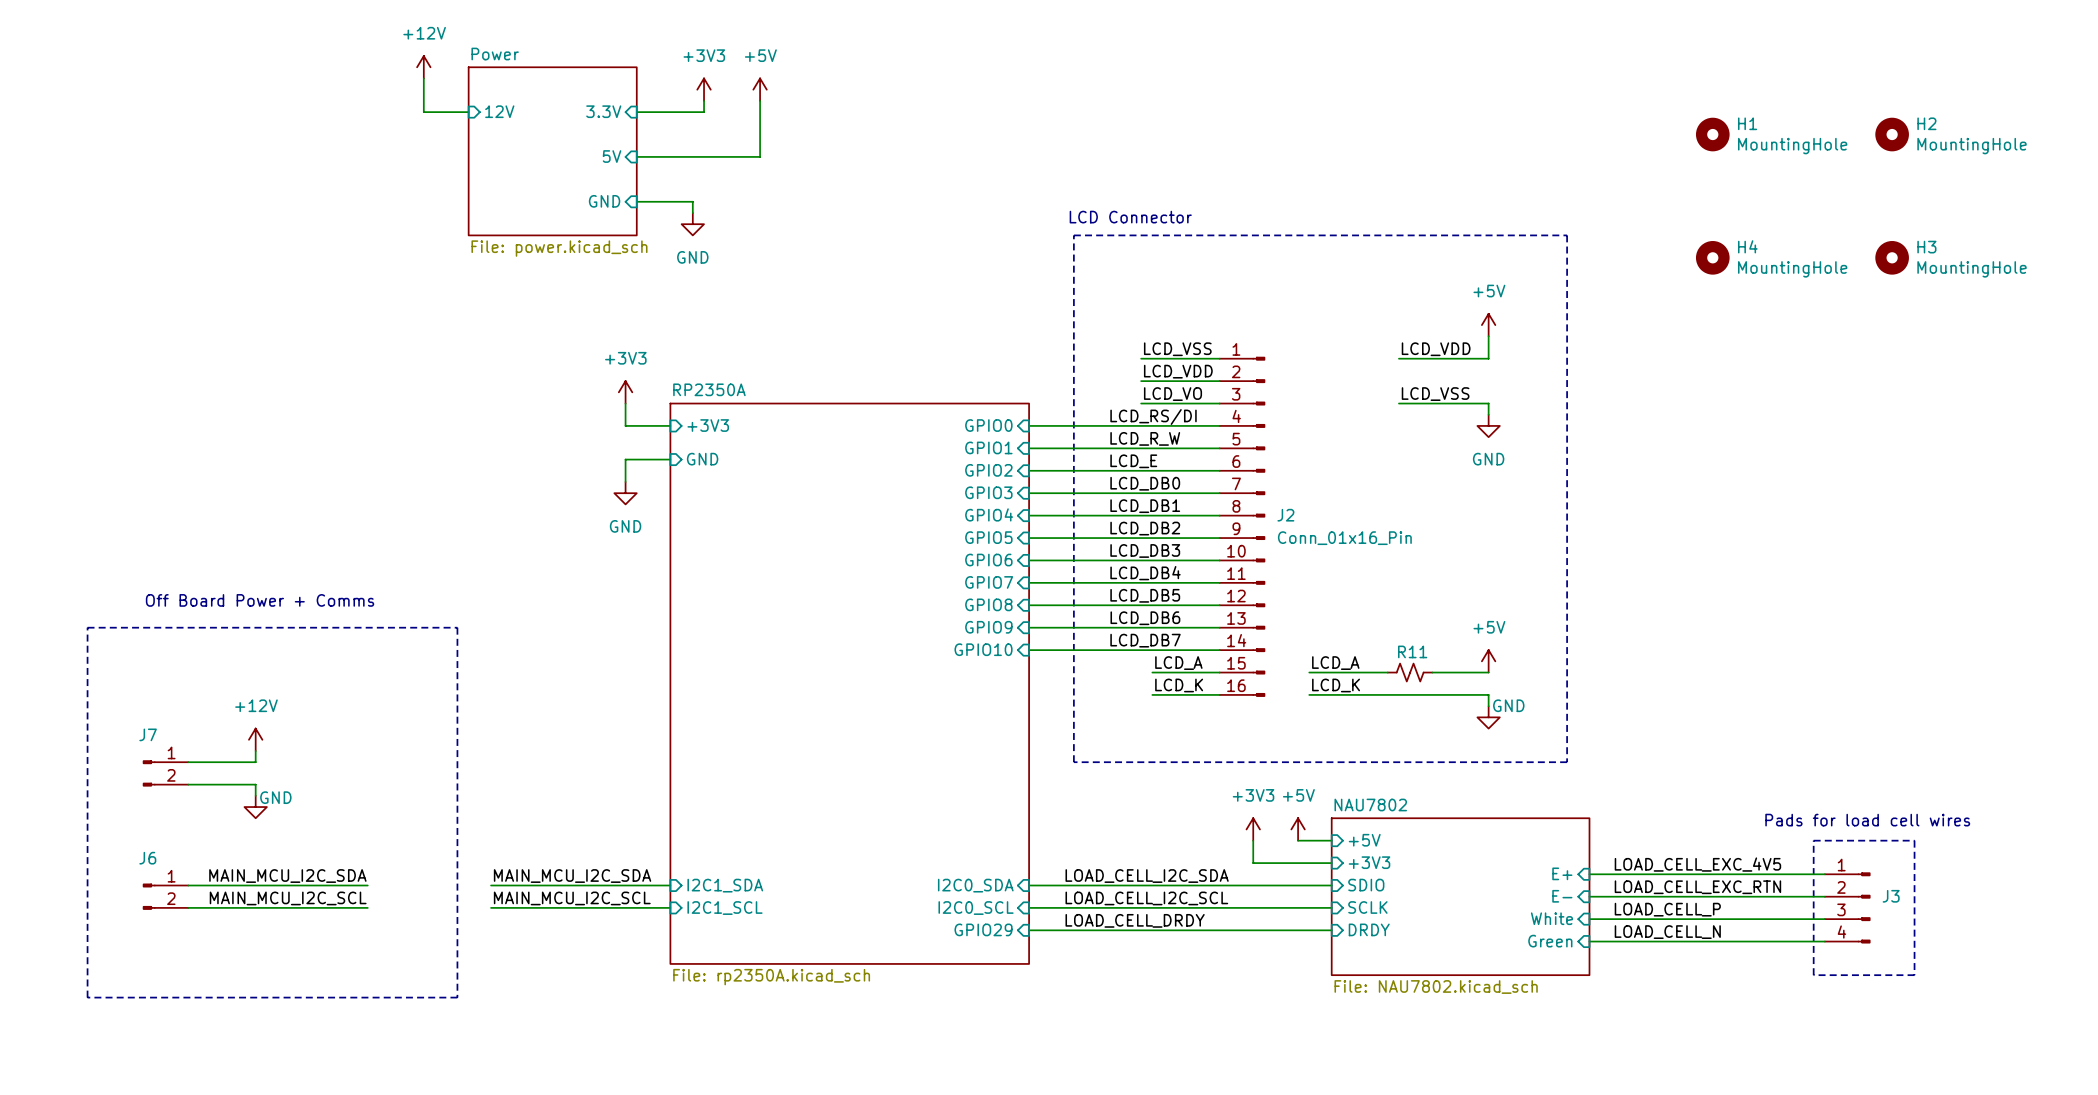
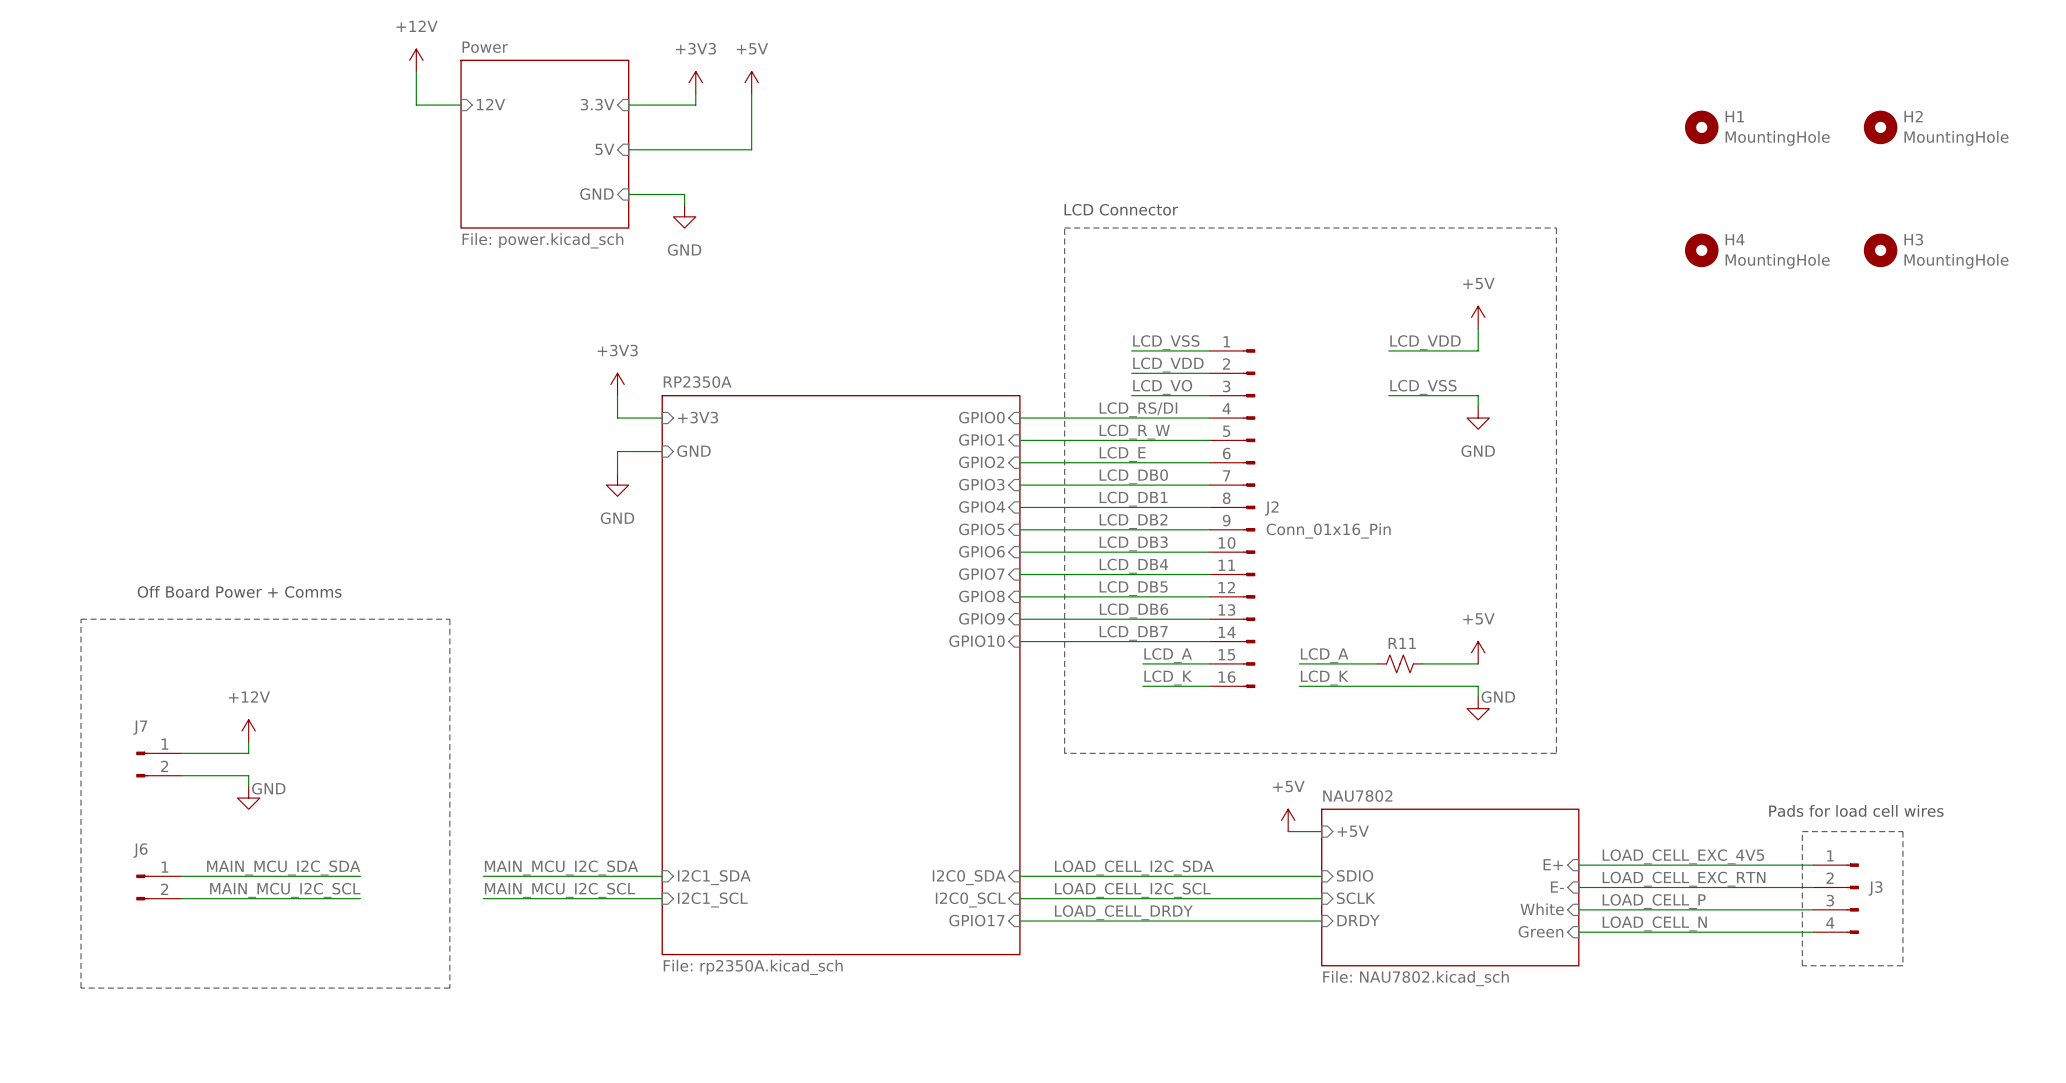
power symbol: +3V3 (1253, 829) -> none
wire: (1253, 840) (1253, 863) (1331, 863) -> none
sheet pin: +3V3 (1369, 862) -> none
sheet pin: GPIO29 (983, 929) -> GPIO17 (976, 920)

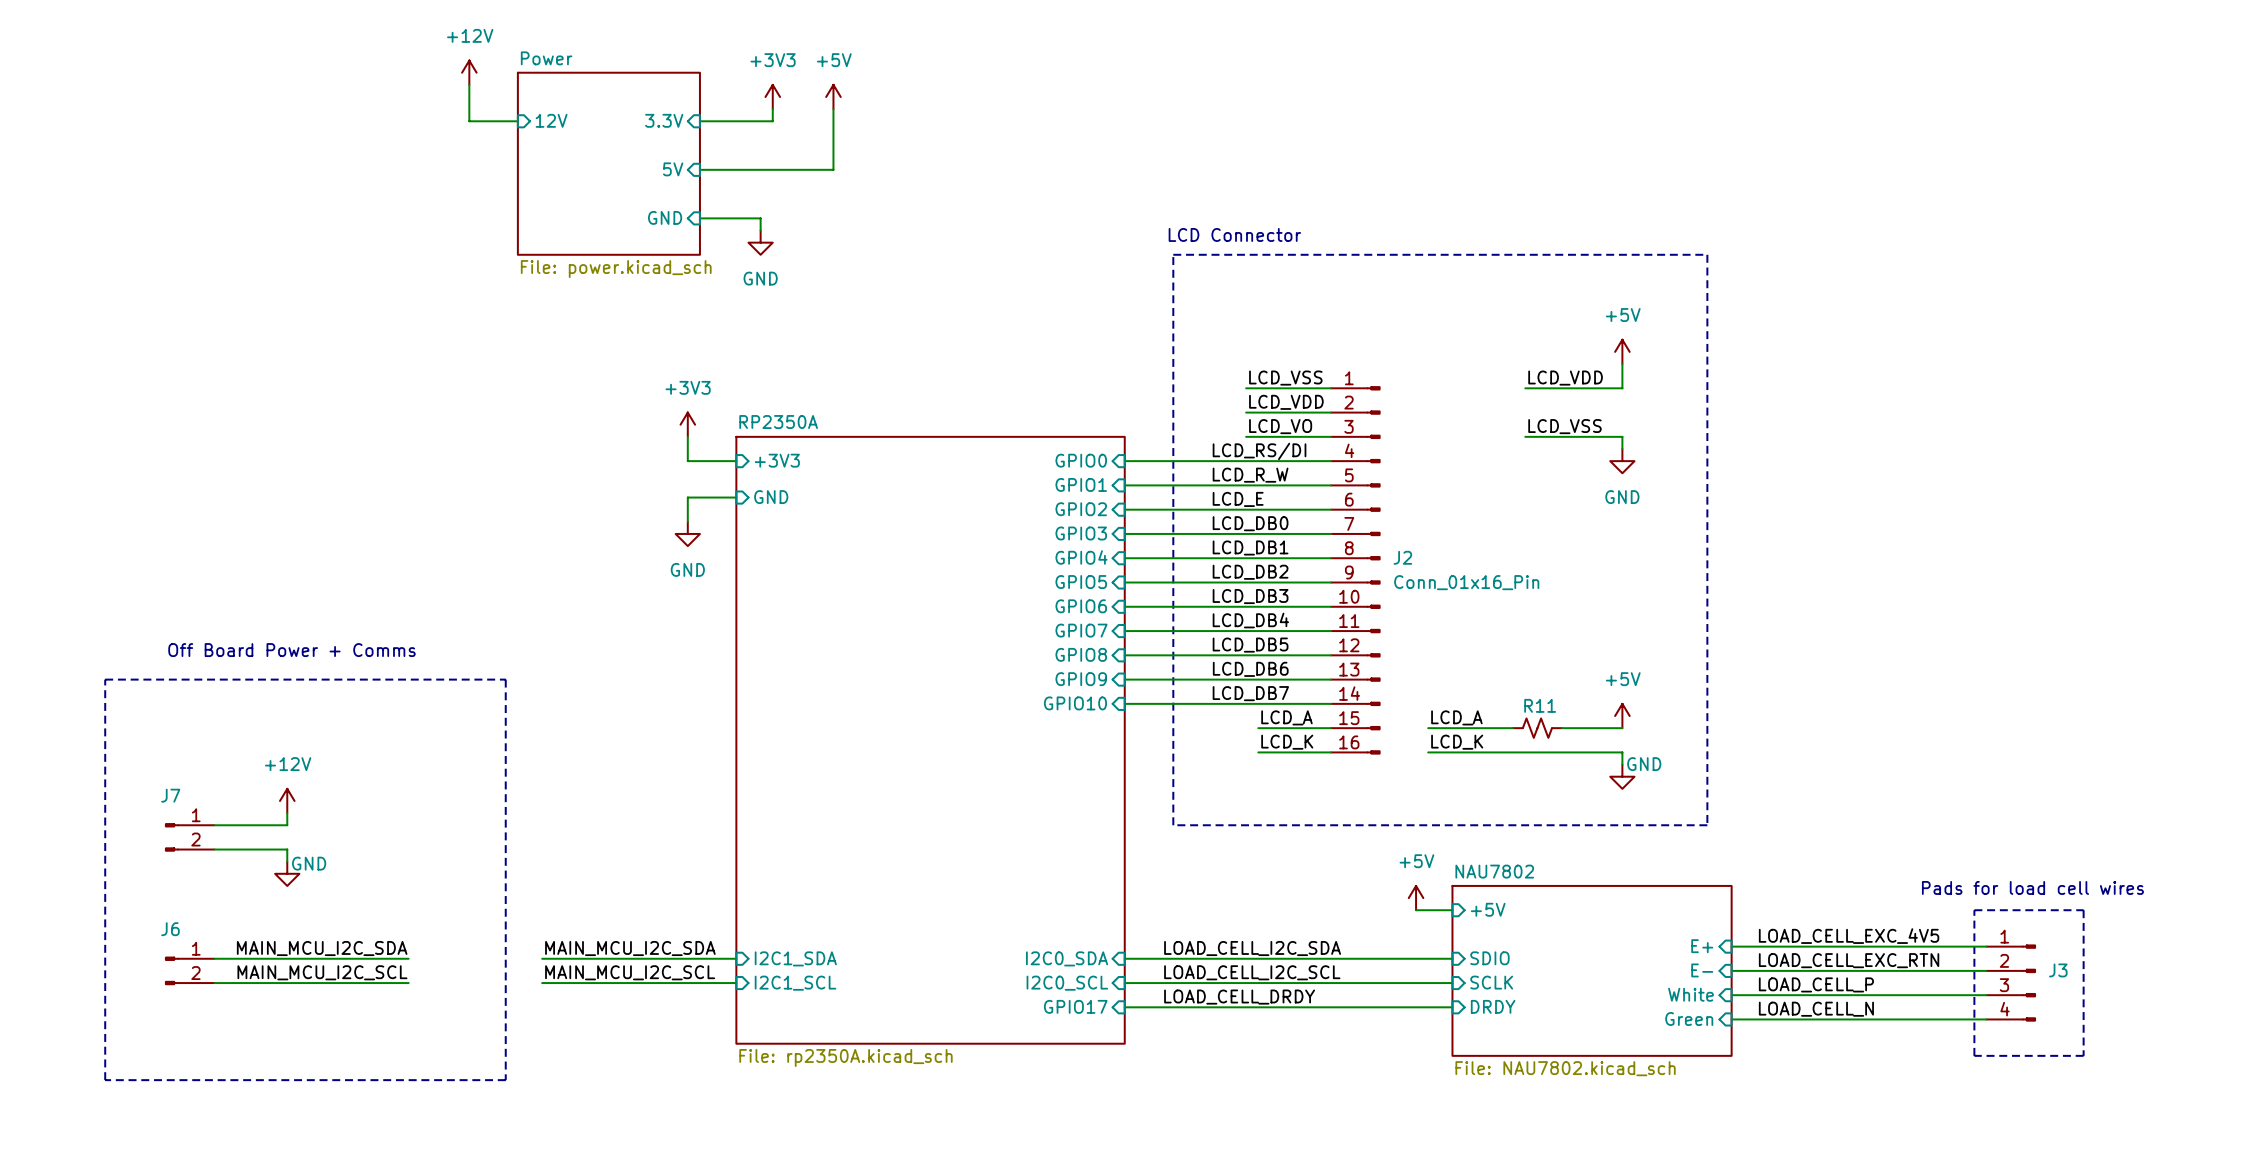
H1: MountingHole (1701, 127) -> none
H2: MountingHole (1880, 127) -> none
H4: MountingHole (1701, 250) -> none
H3: MountingHole (1880, 250) -> none

